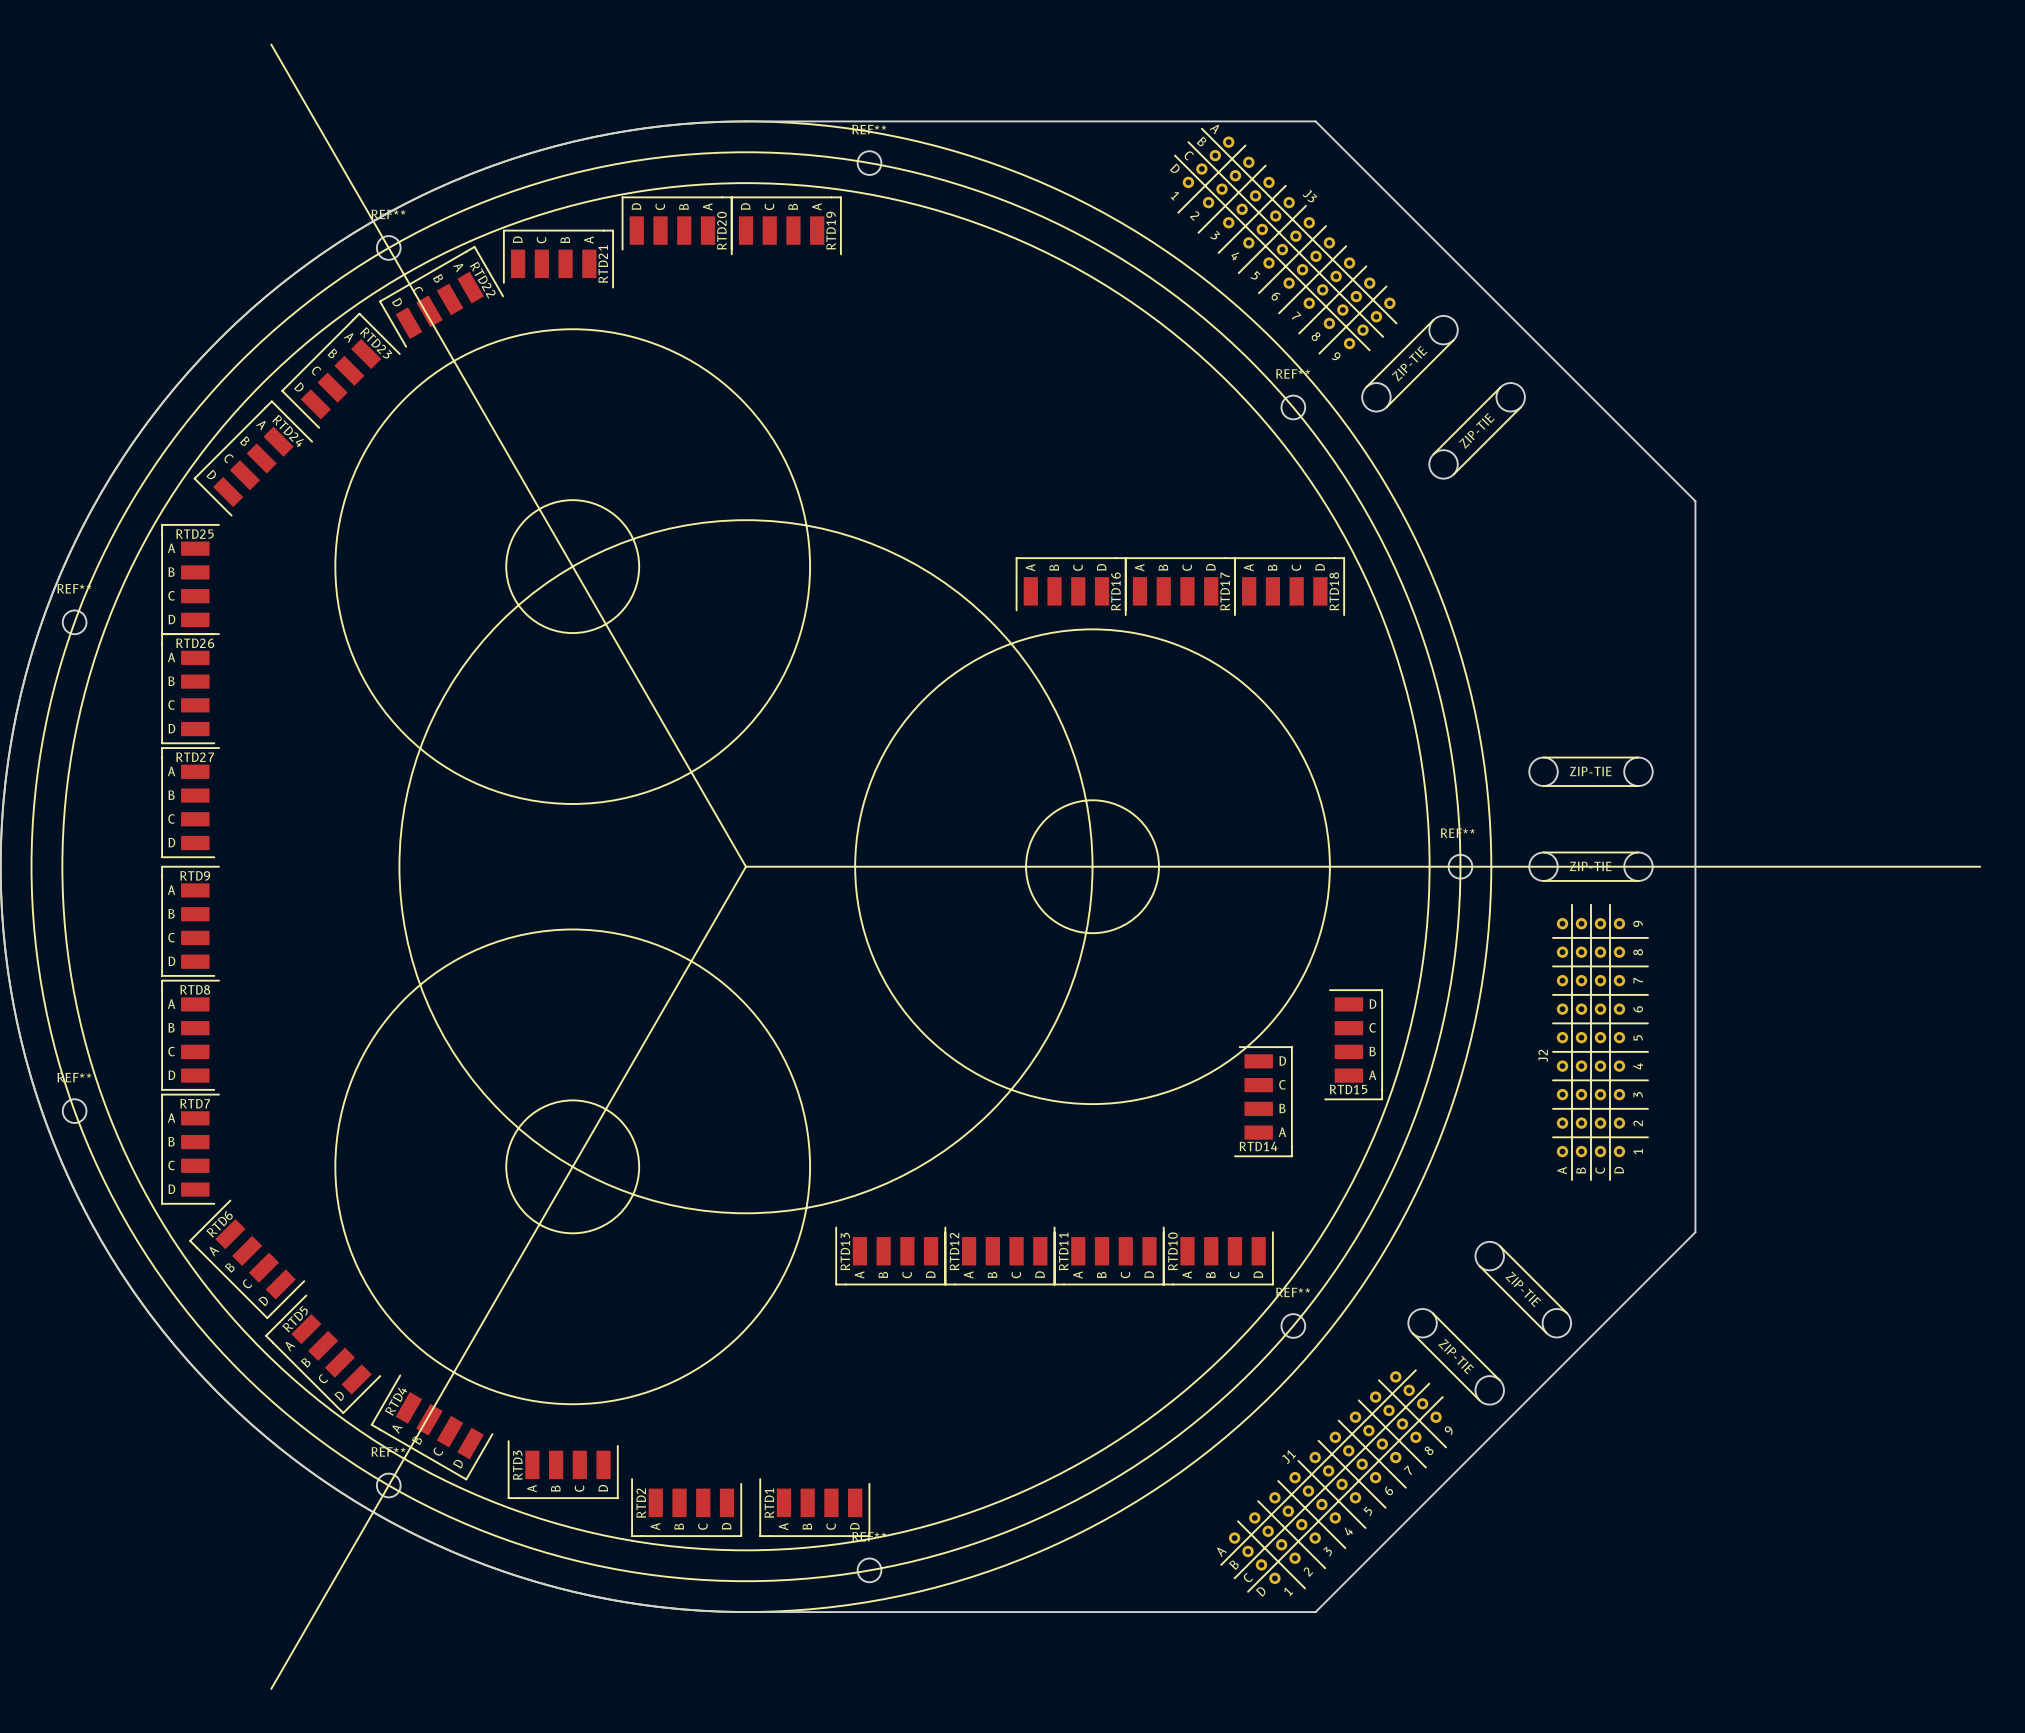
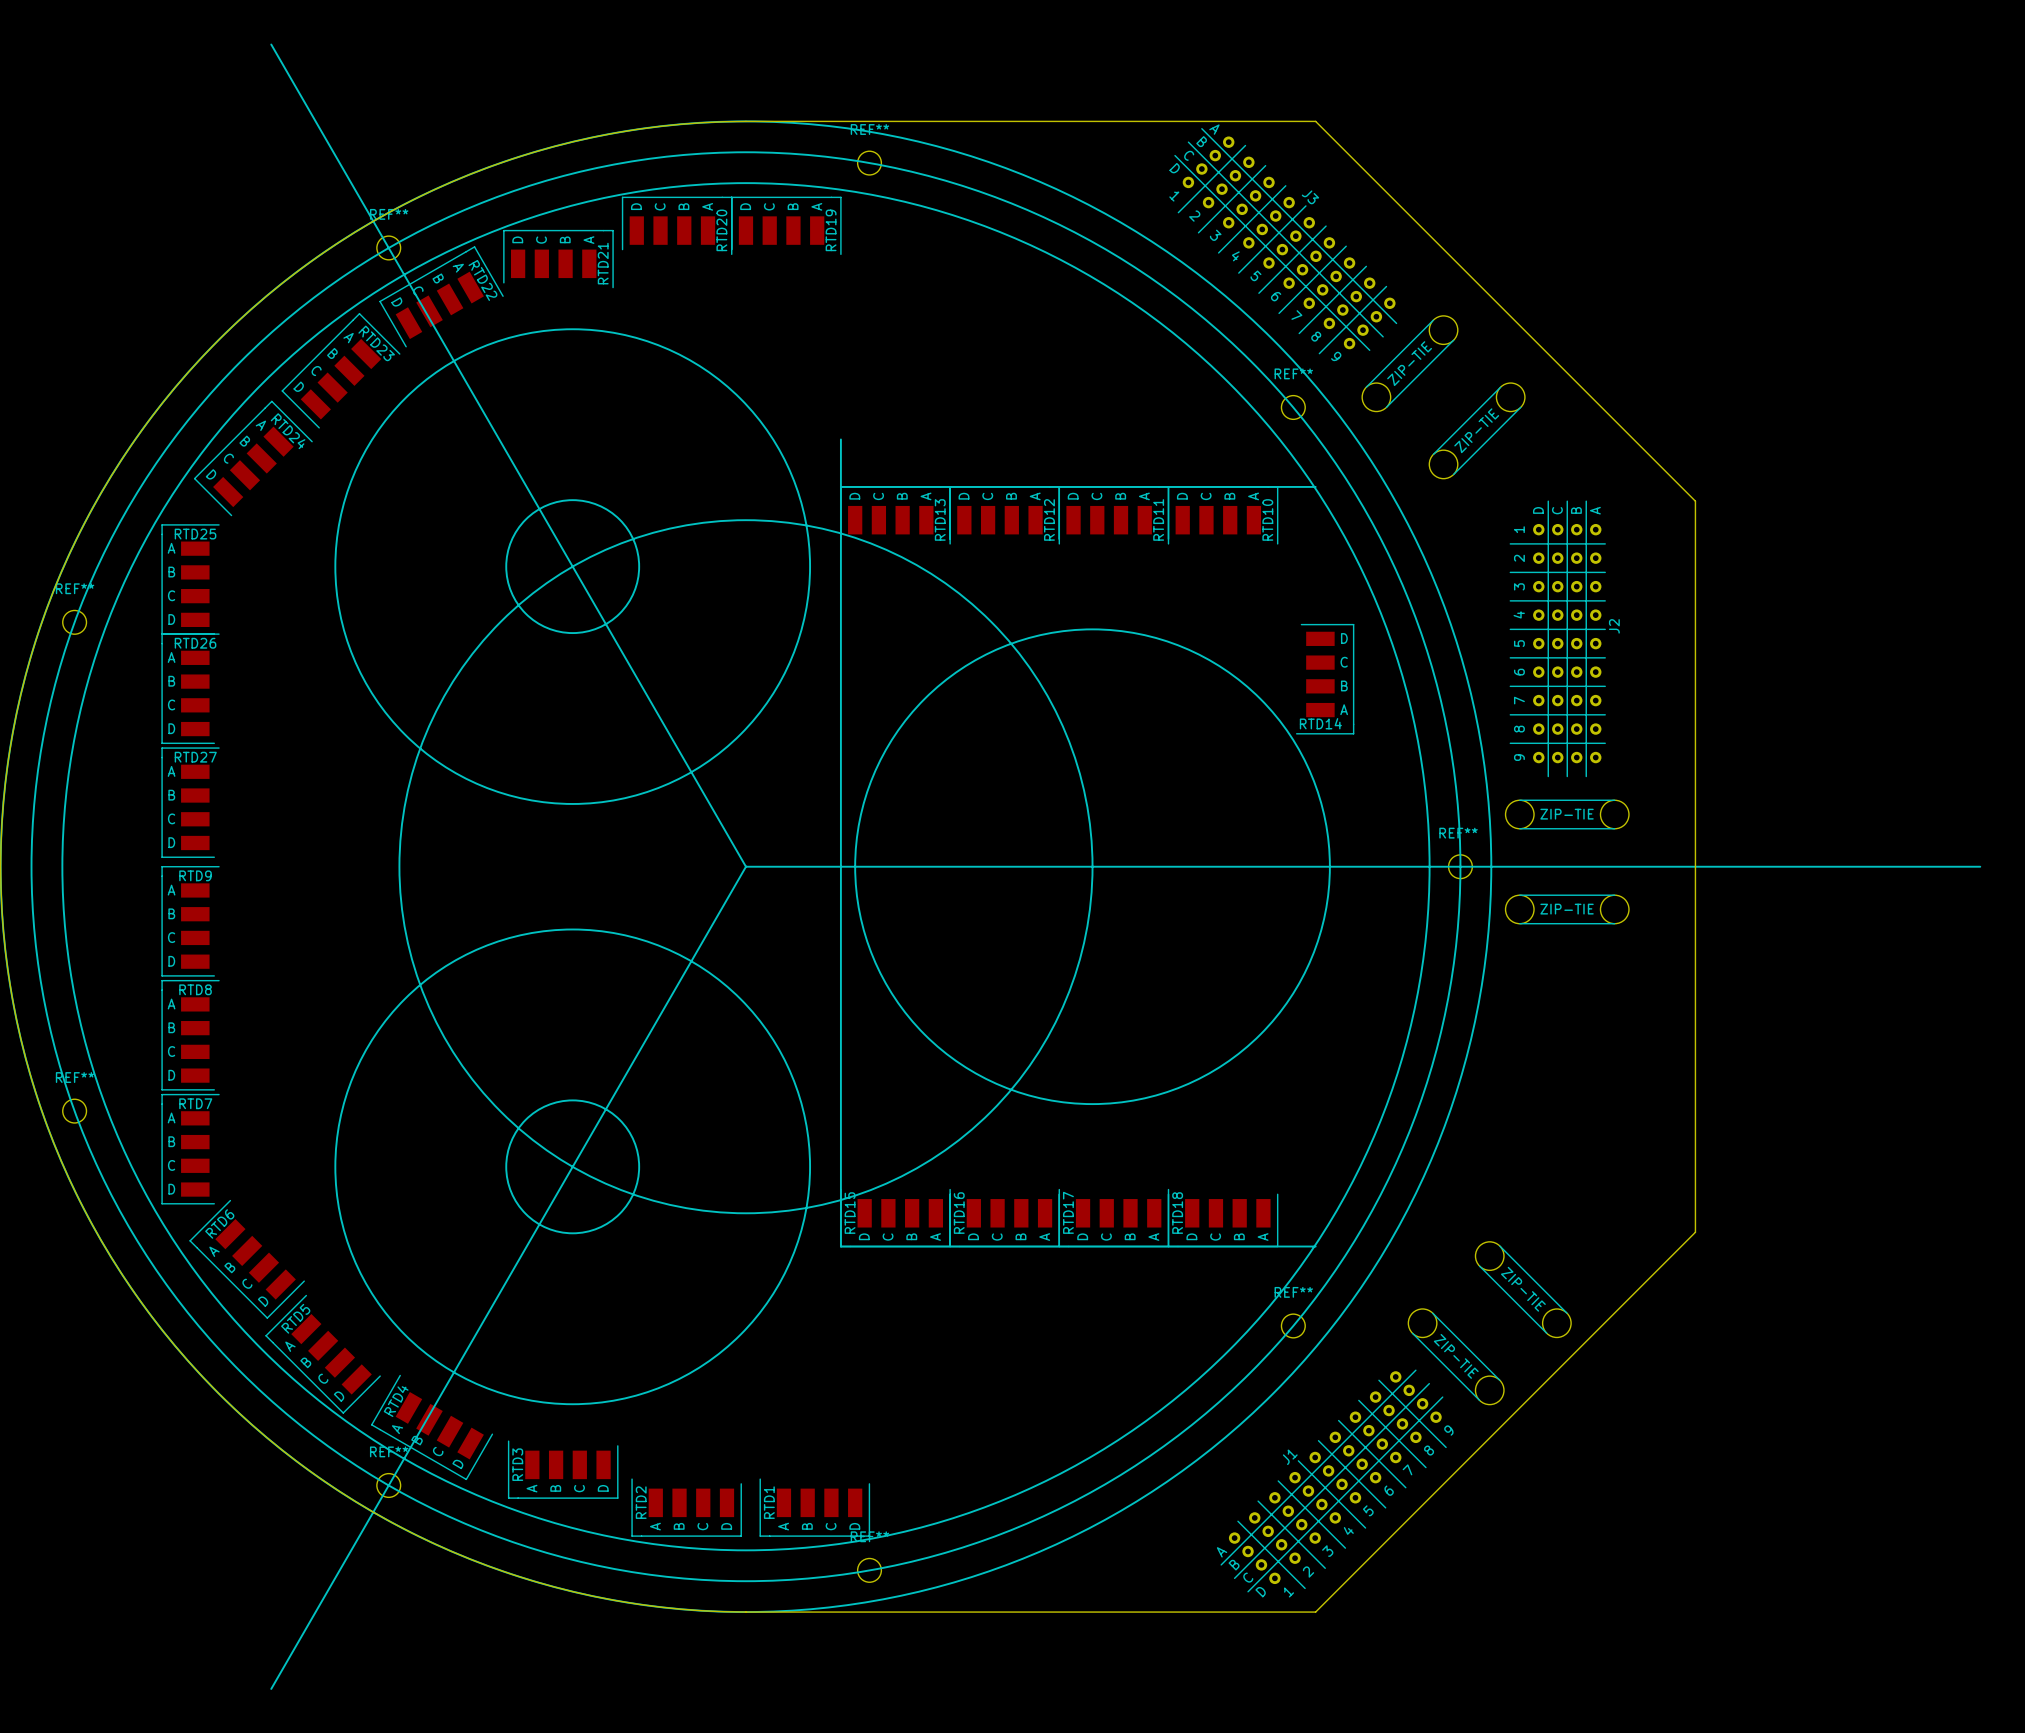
line: none -> (840, 439) (840, 1246) (1315, 1246)
line: none -> (840, 486) (1315, 486)
RTD16 rotation: 0° (1071, 586) -> 180° (1004, 1218)
RTD16 position: (1071, 586) -> (1004, 1218)
RTD17 rotation: 0° (1180, 586) -> 180° (1113, 1218)
RTD17 position: (1180, 586) -> (1113, 1218)
RTD18 rotation: 0° (1289, 586) -> 180° (1223, 1218)
RTD18 position: (1289, 586) -> (1223, 1218)
drawing: [1025, 799, 1160, 935] -> none
J2 rotation: 0° (1590, 968) -> 180° (1567, 712)
J2 position: (1590, 968) -> (1567, 712)
RTD15 footprint: [1324, 989, 1383, 1101] -> [840, 1188, 951, 1248]
RTD15 name position: RTD15 (1348, 1089) -> RTD15 (850, 1213)
RTD14 position: (1263, 1101) -> (1325, 679)
RTD13 rotation: 0° (890, 1256) -> 180° (895, 515)
RTD13 position: (890, 1256) -> (895, 515)
RTD12 rotation: 0° (999, 1256) -> 180° (1004, 515)
RTD12 position: (999, 1256) -> (1004, 515)
RTD11 rotation: 0° (1109, 1256) -> 180° (1113, 515)
RTD11 position: (1109, 1256) -> (1113, 515)
RTD10 rotation: 0° (1218, 1256) -> 180° (1223, 515)
RTD10 position: (1218, 1256) -> (1223, 515)

